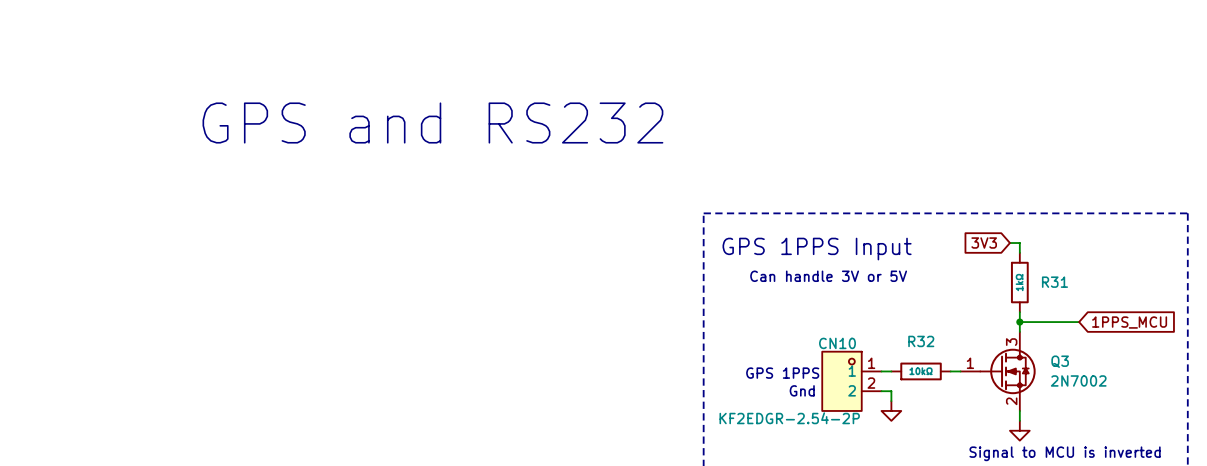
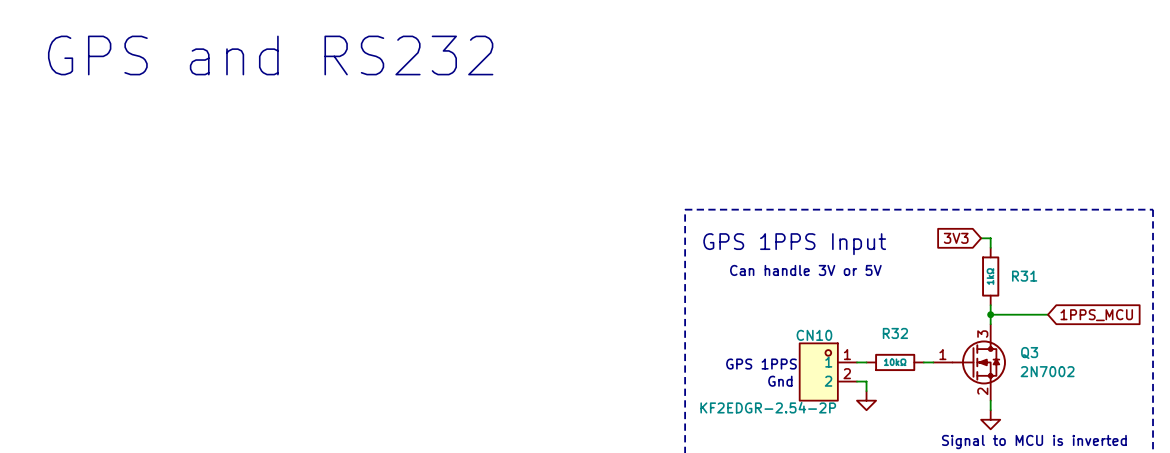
text position: GPS and RS232 (432, 122) -> GPS and RS232 (270, 55)

